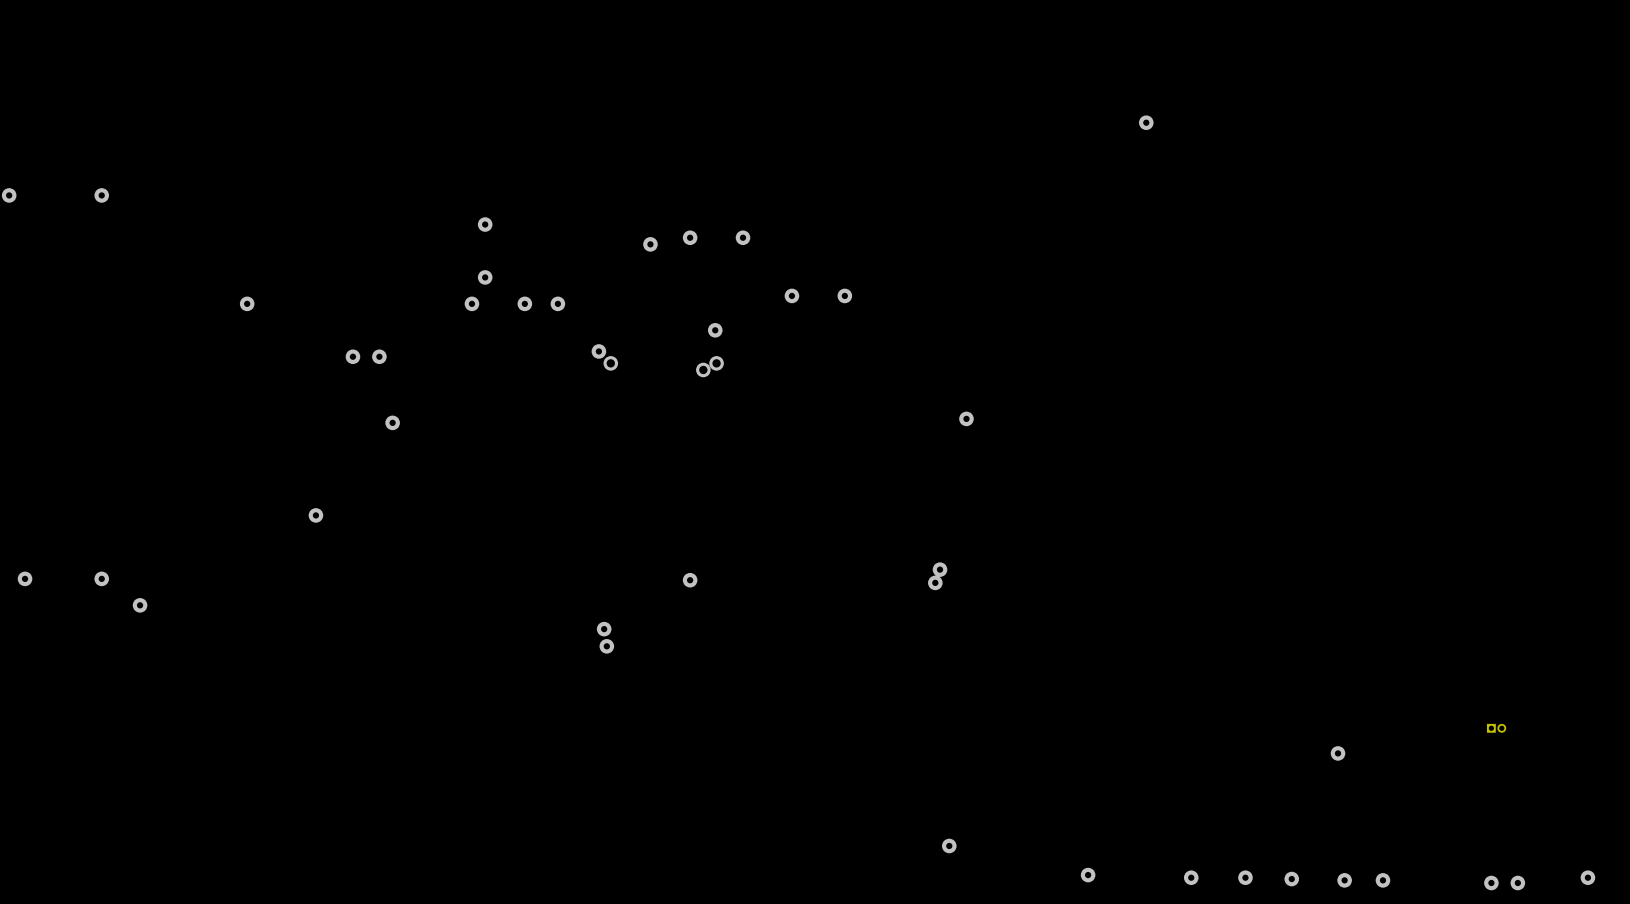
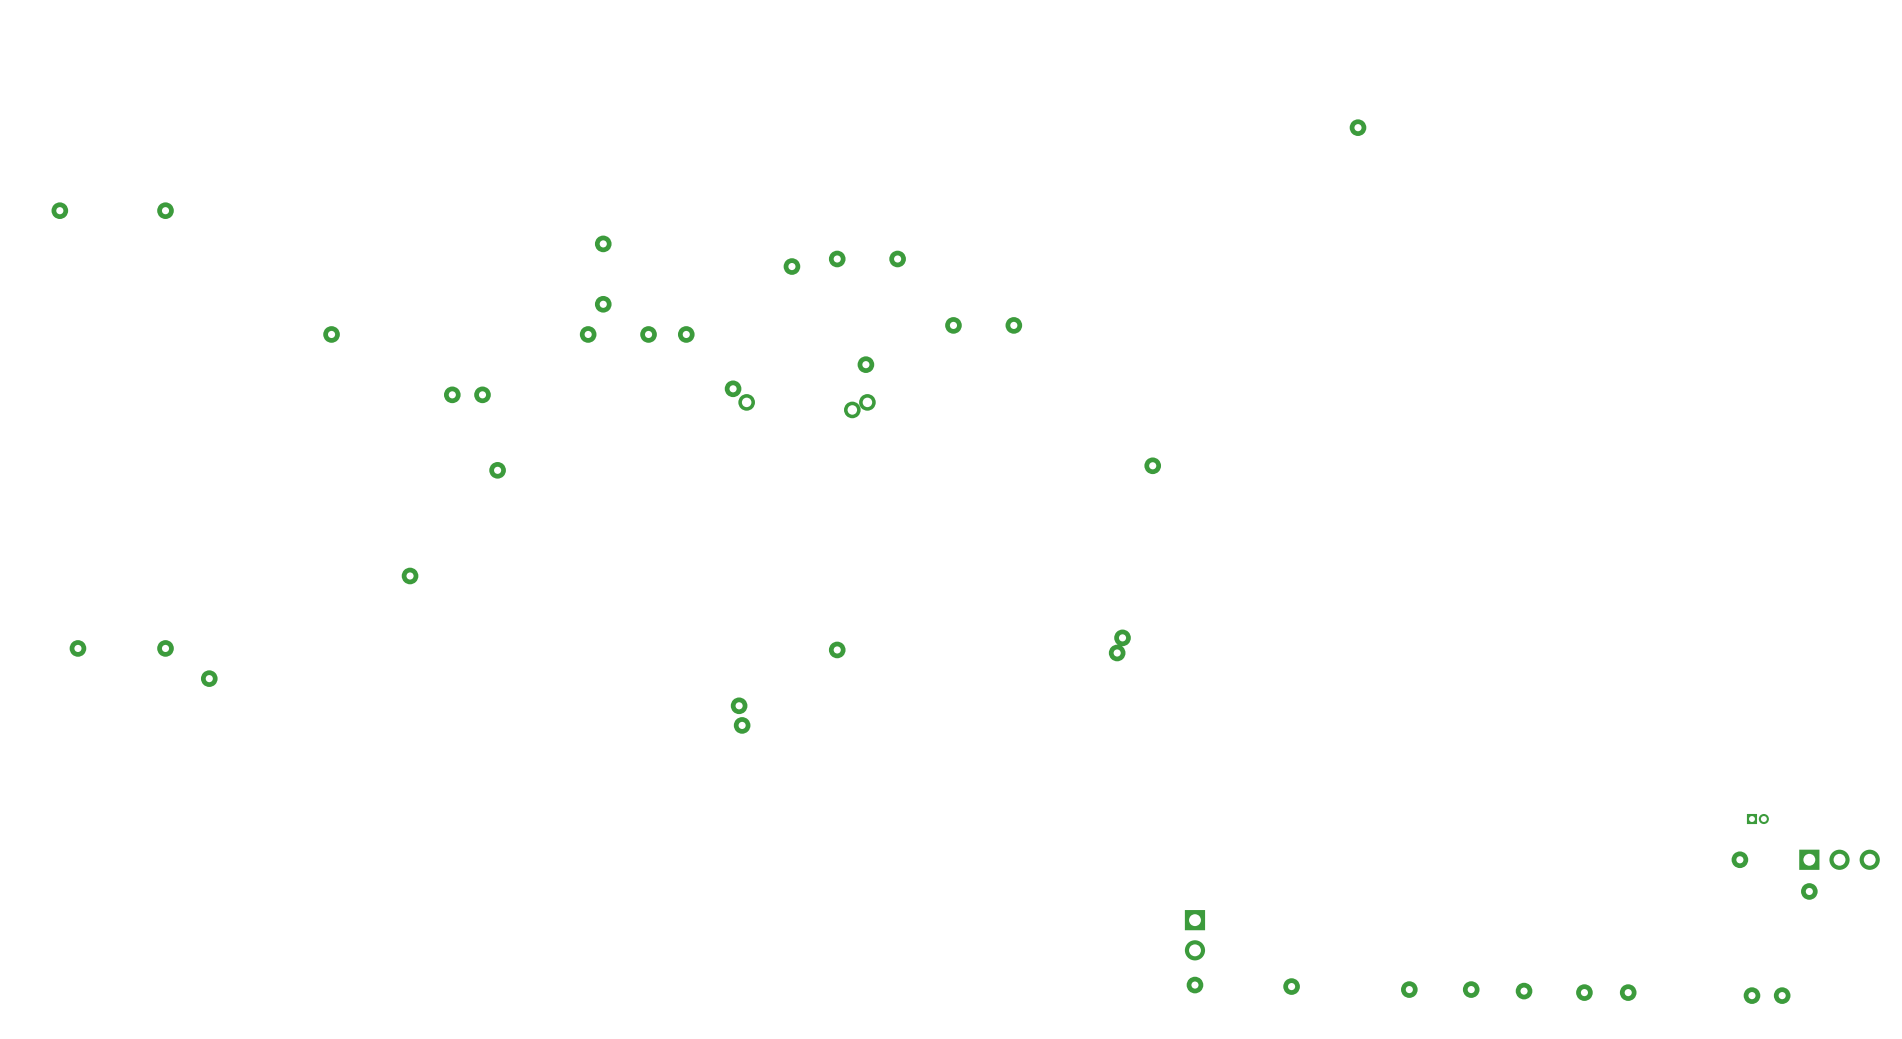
via: (1338, 753) -> none
via: none -> (1739, 859)
part: none -> (1839, 859)
via: none -> (1809, 891)
part: none -> (1194, 935)
via position: (949, 845) -> (1194, 985)
via: (1587, 877) -> none

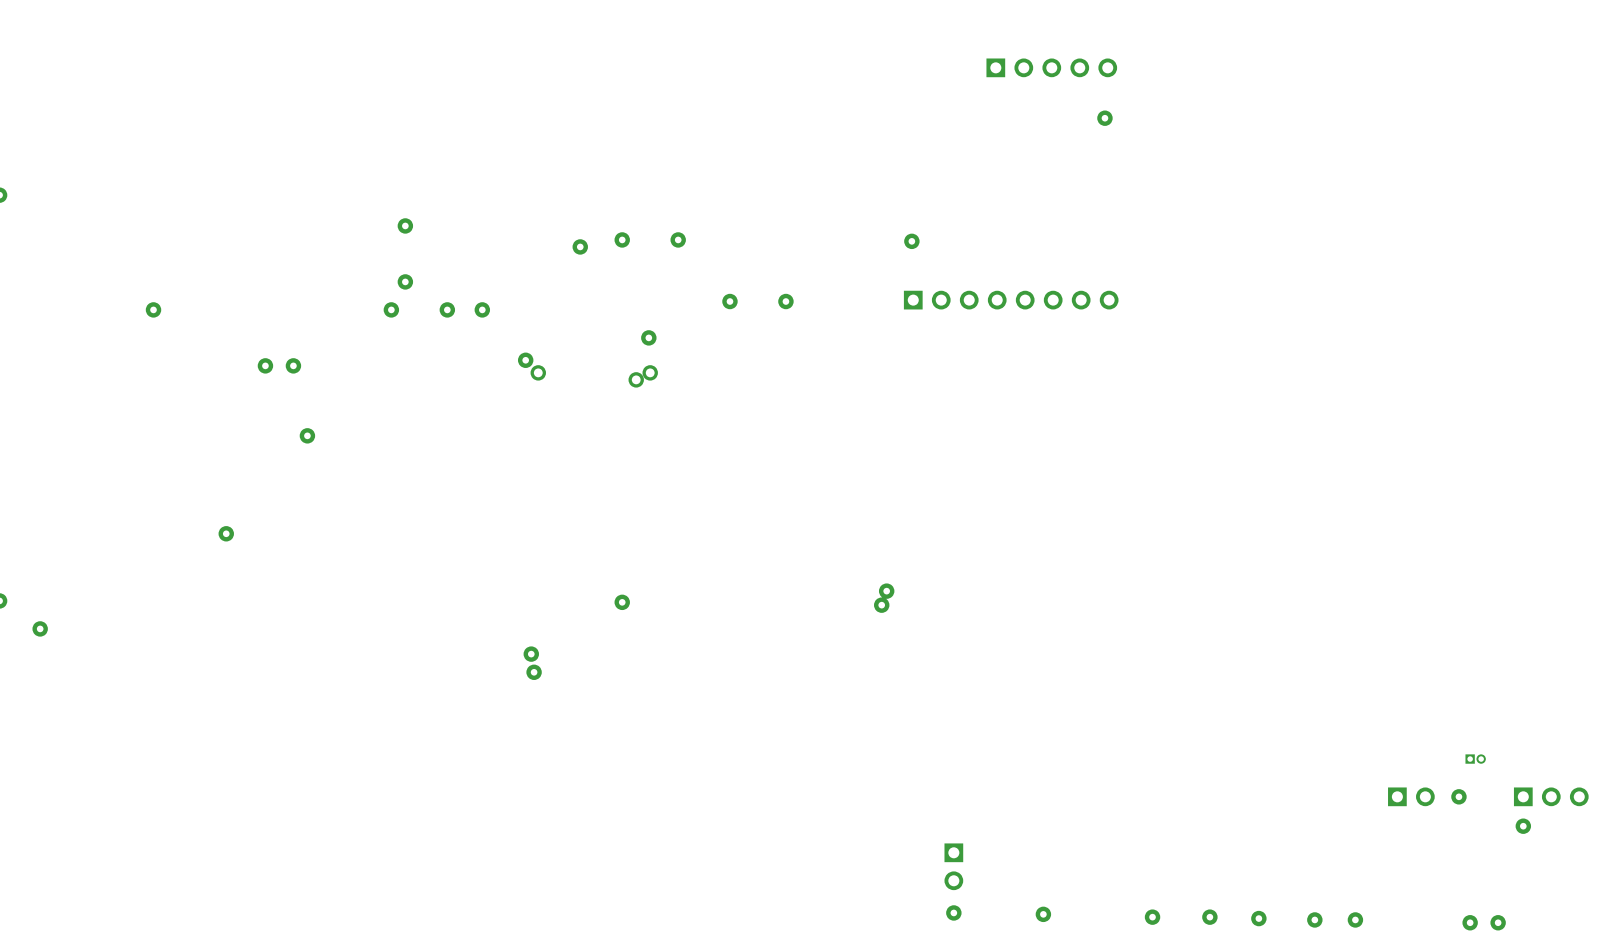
part: none -> (1051, 67)
via: none -> (911, 241)
part: none -> (1011, 300)
via: (1152, 465) -> none
part: none -> (1411, 796)

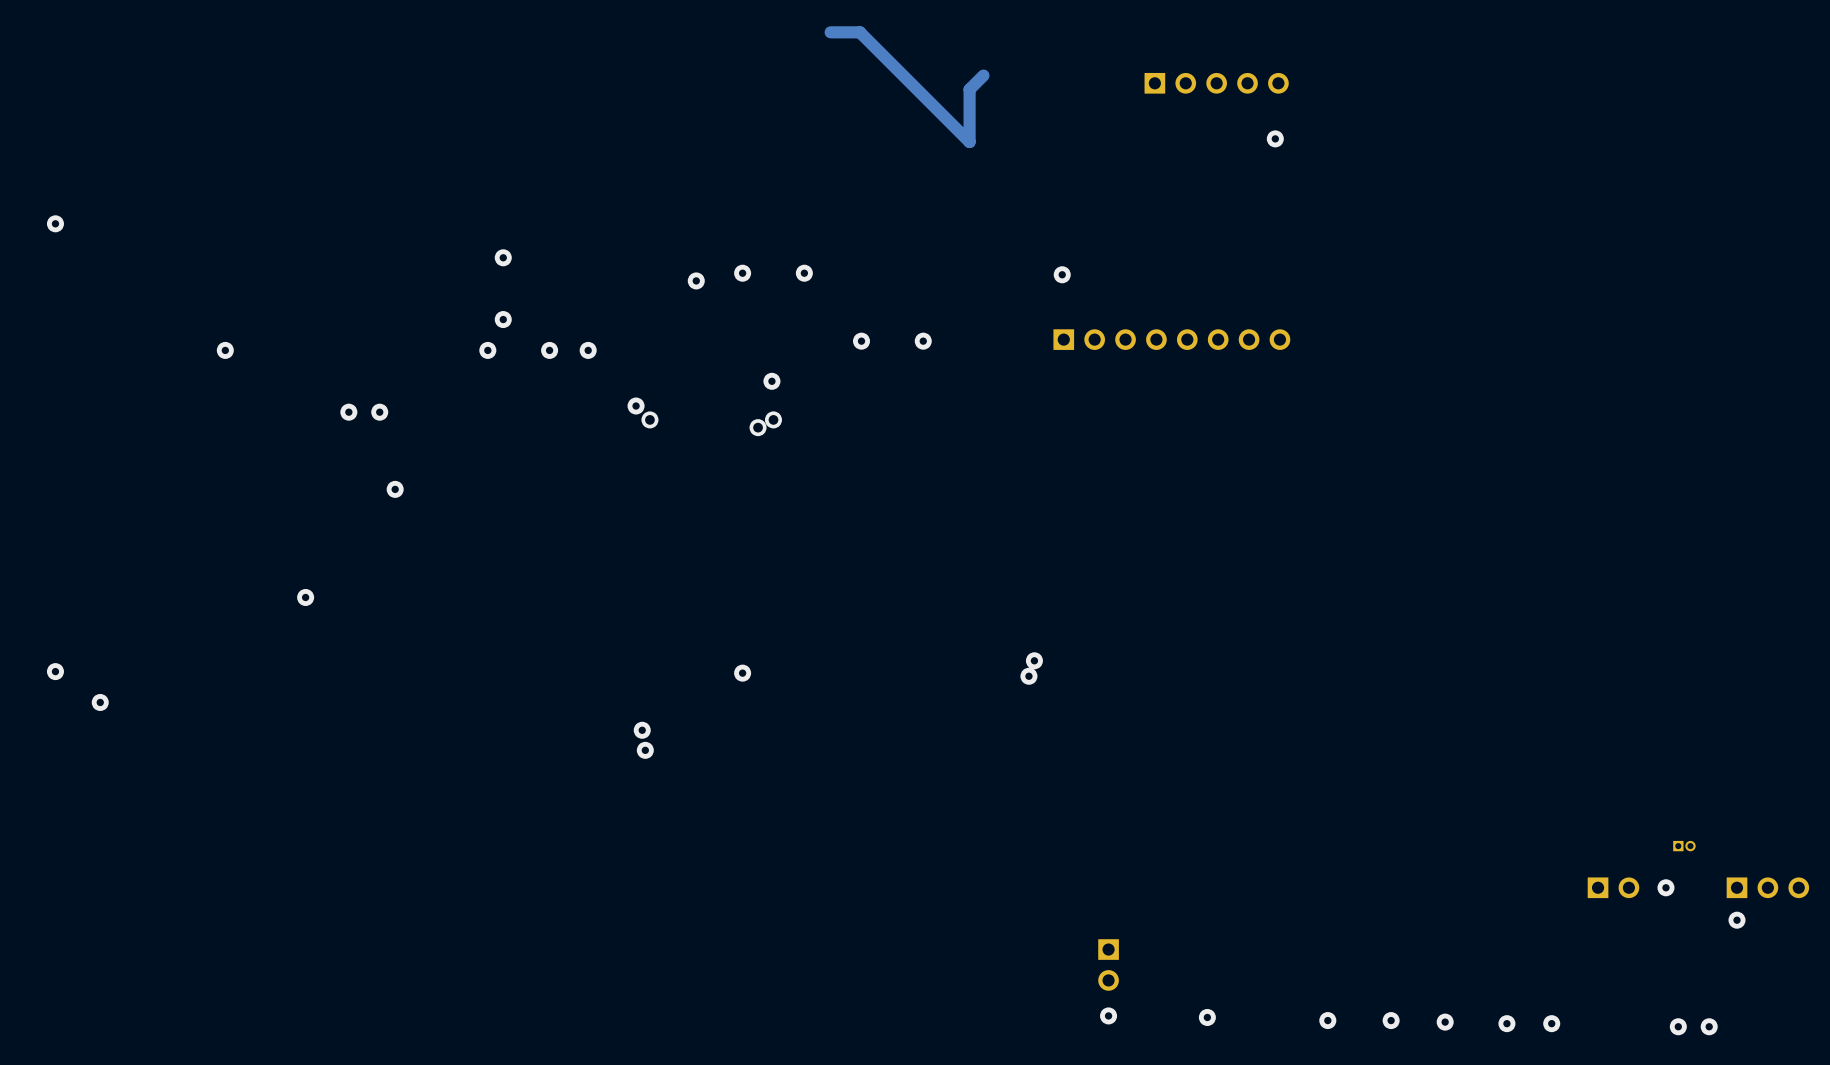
track: none -> (830, 32) (859, 32) (969, 141) (969, 89) (983, 75)

